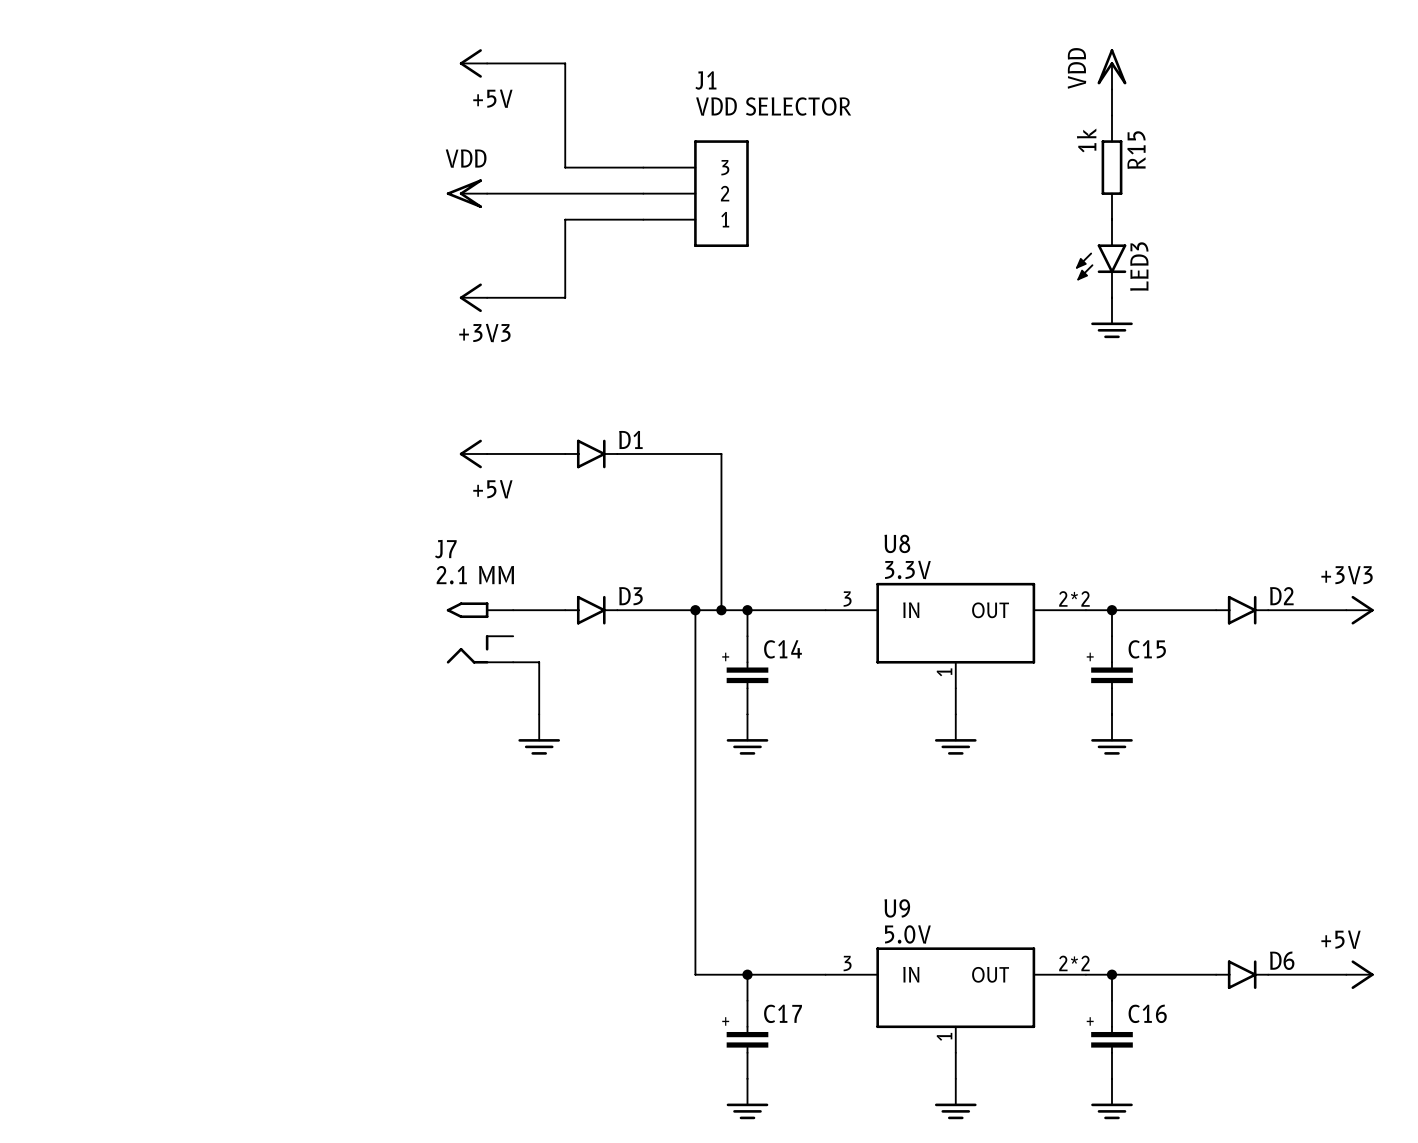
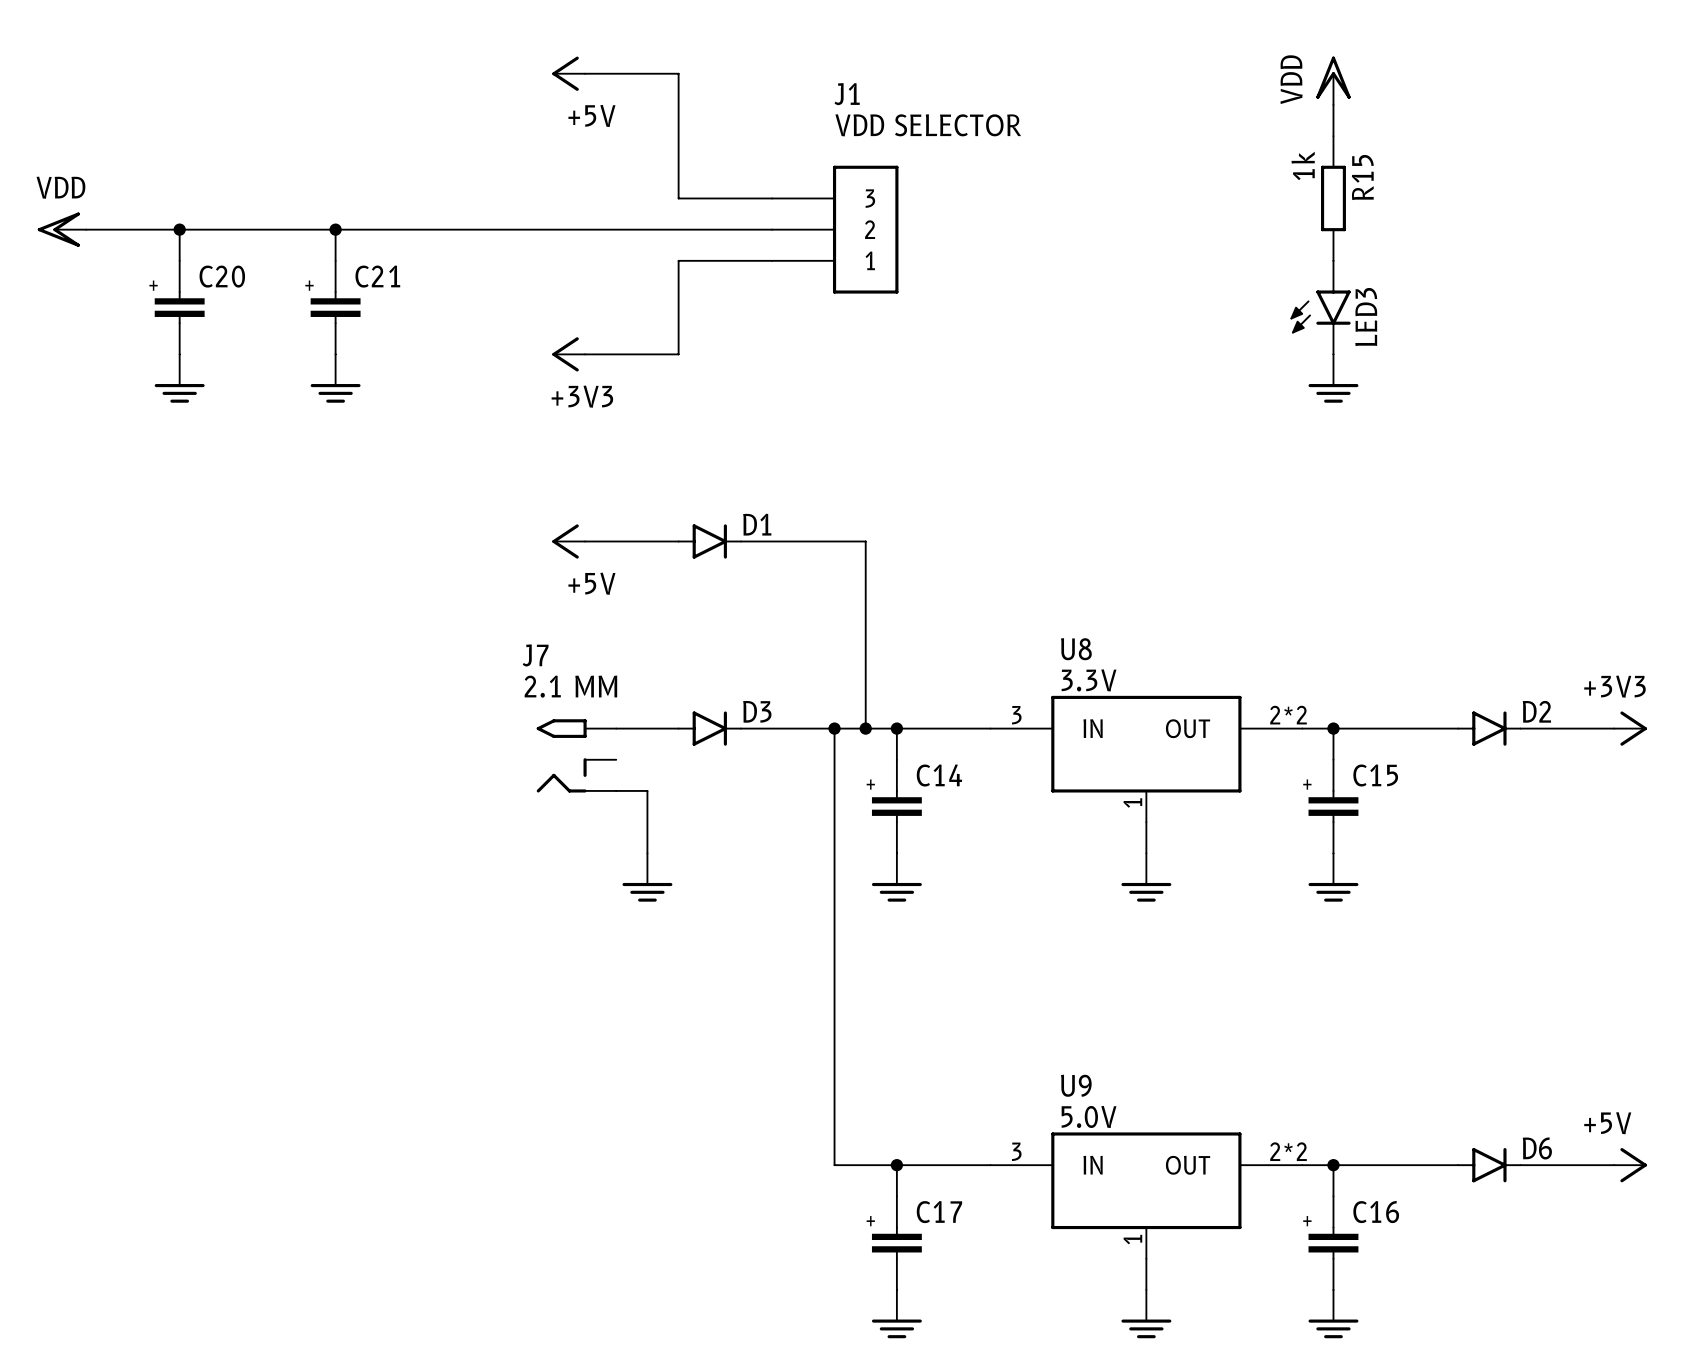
power symbol: none -> VDD (61, 229)
wire: none -> (86, 229) (585, 229)
wire: none -> (179, 229) (179, 260)
junction: none -> (179, 229)
wire: none -> (335, 229) (335, 260)
junction: none -> (335, 229)
power symbol: VDD (466, 193) -> none
C20: none -> (179, 307)
C21: none -> (335, 307)
power symbol: none -> (179, 378)
power symbol: none -> (335, 378)

